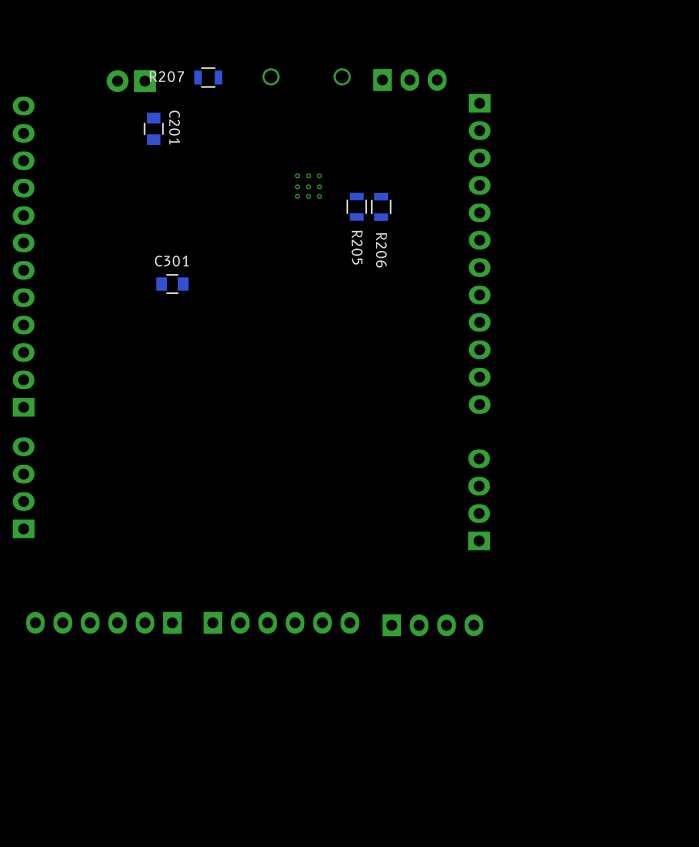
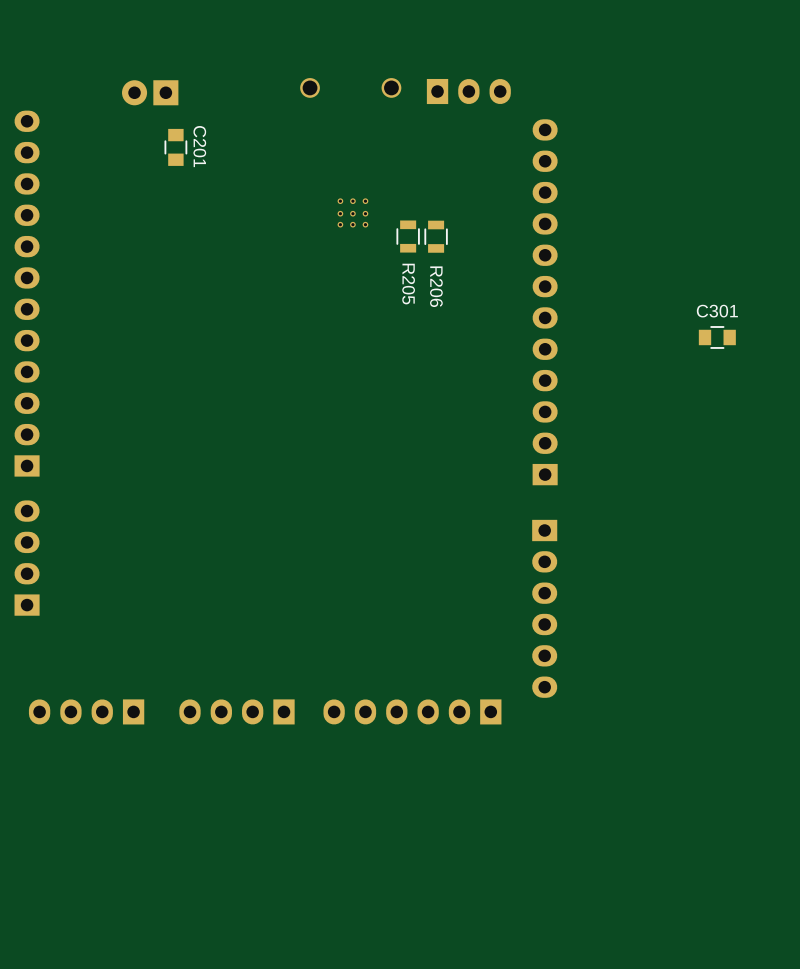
R207: (208, 77) -> none
part rotation: 0° (479, 253) -> 180° (545, 302)
C301 position: (172, 284) -> (717, 337)
part: (479, 499) -> none
part: none -> (544, 608)
part: none -> (86, 711)
part: (103, 622) -> none
part: none -> (237, 711)
part rotation: 0° (281, 622) -> 180° (412, 711)
part: (432, 625) -> none

